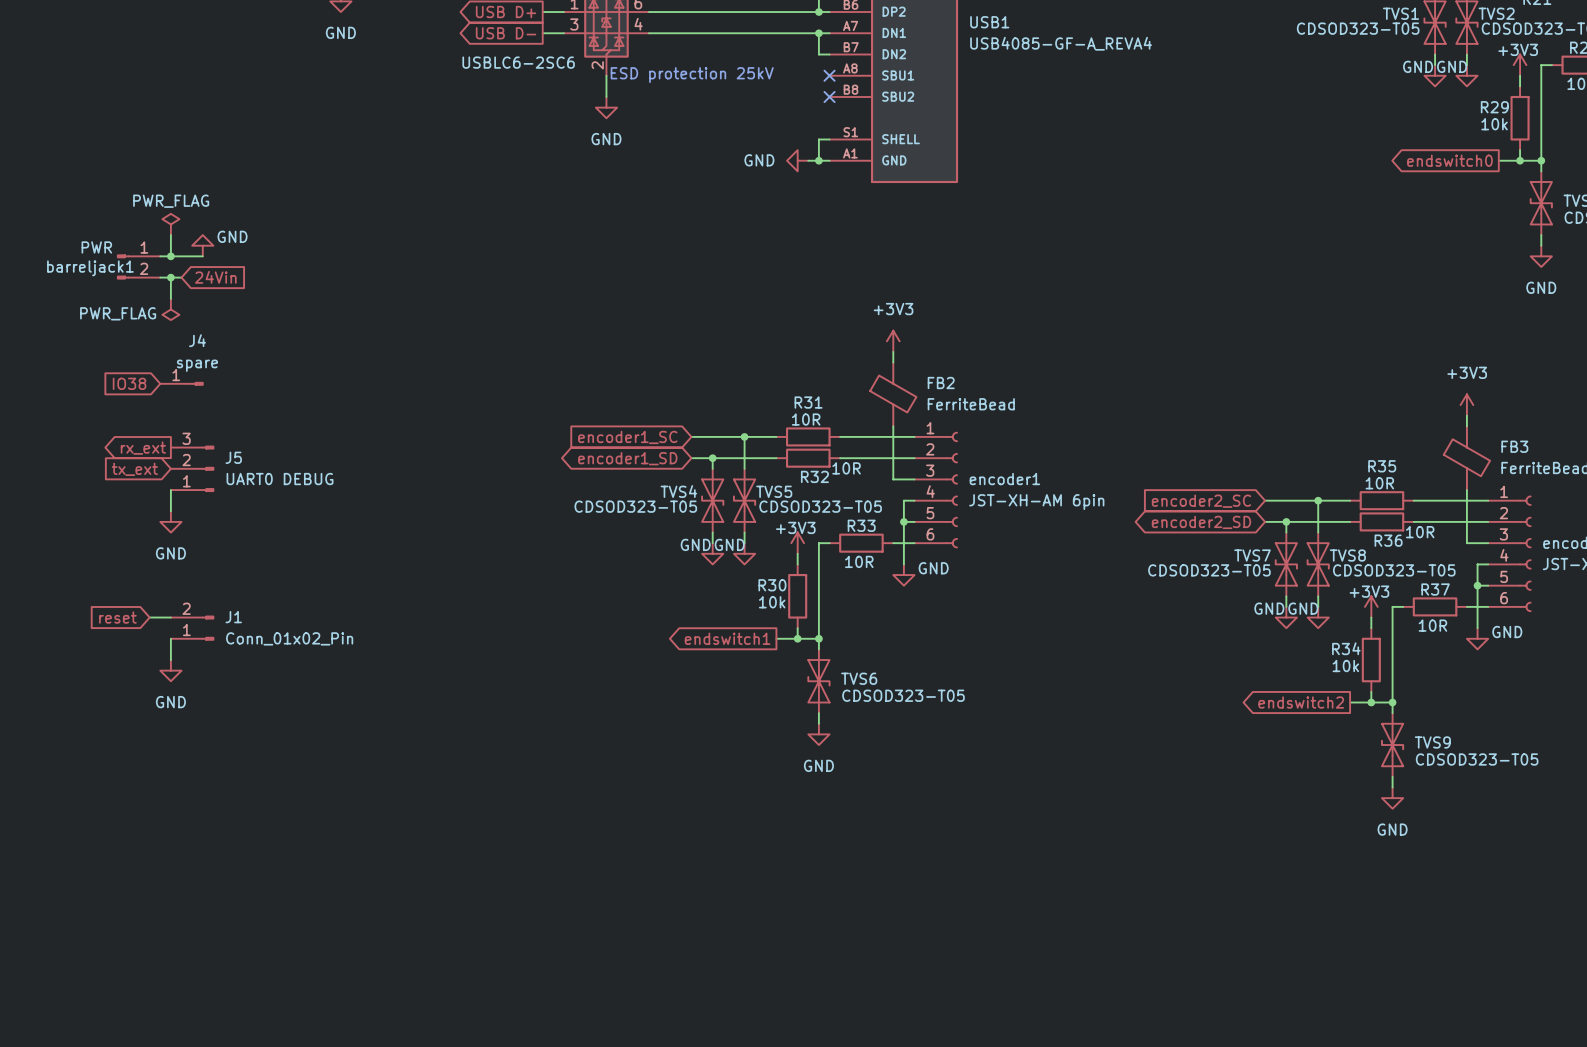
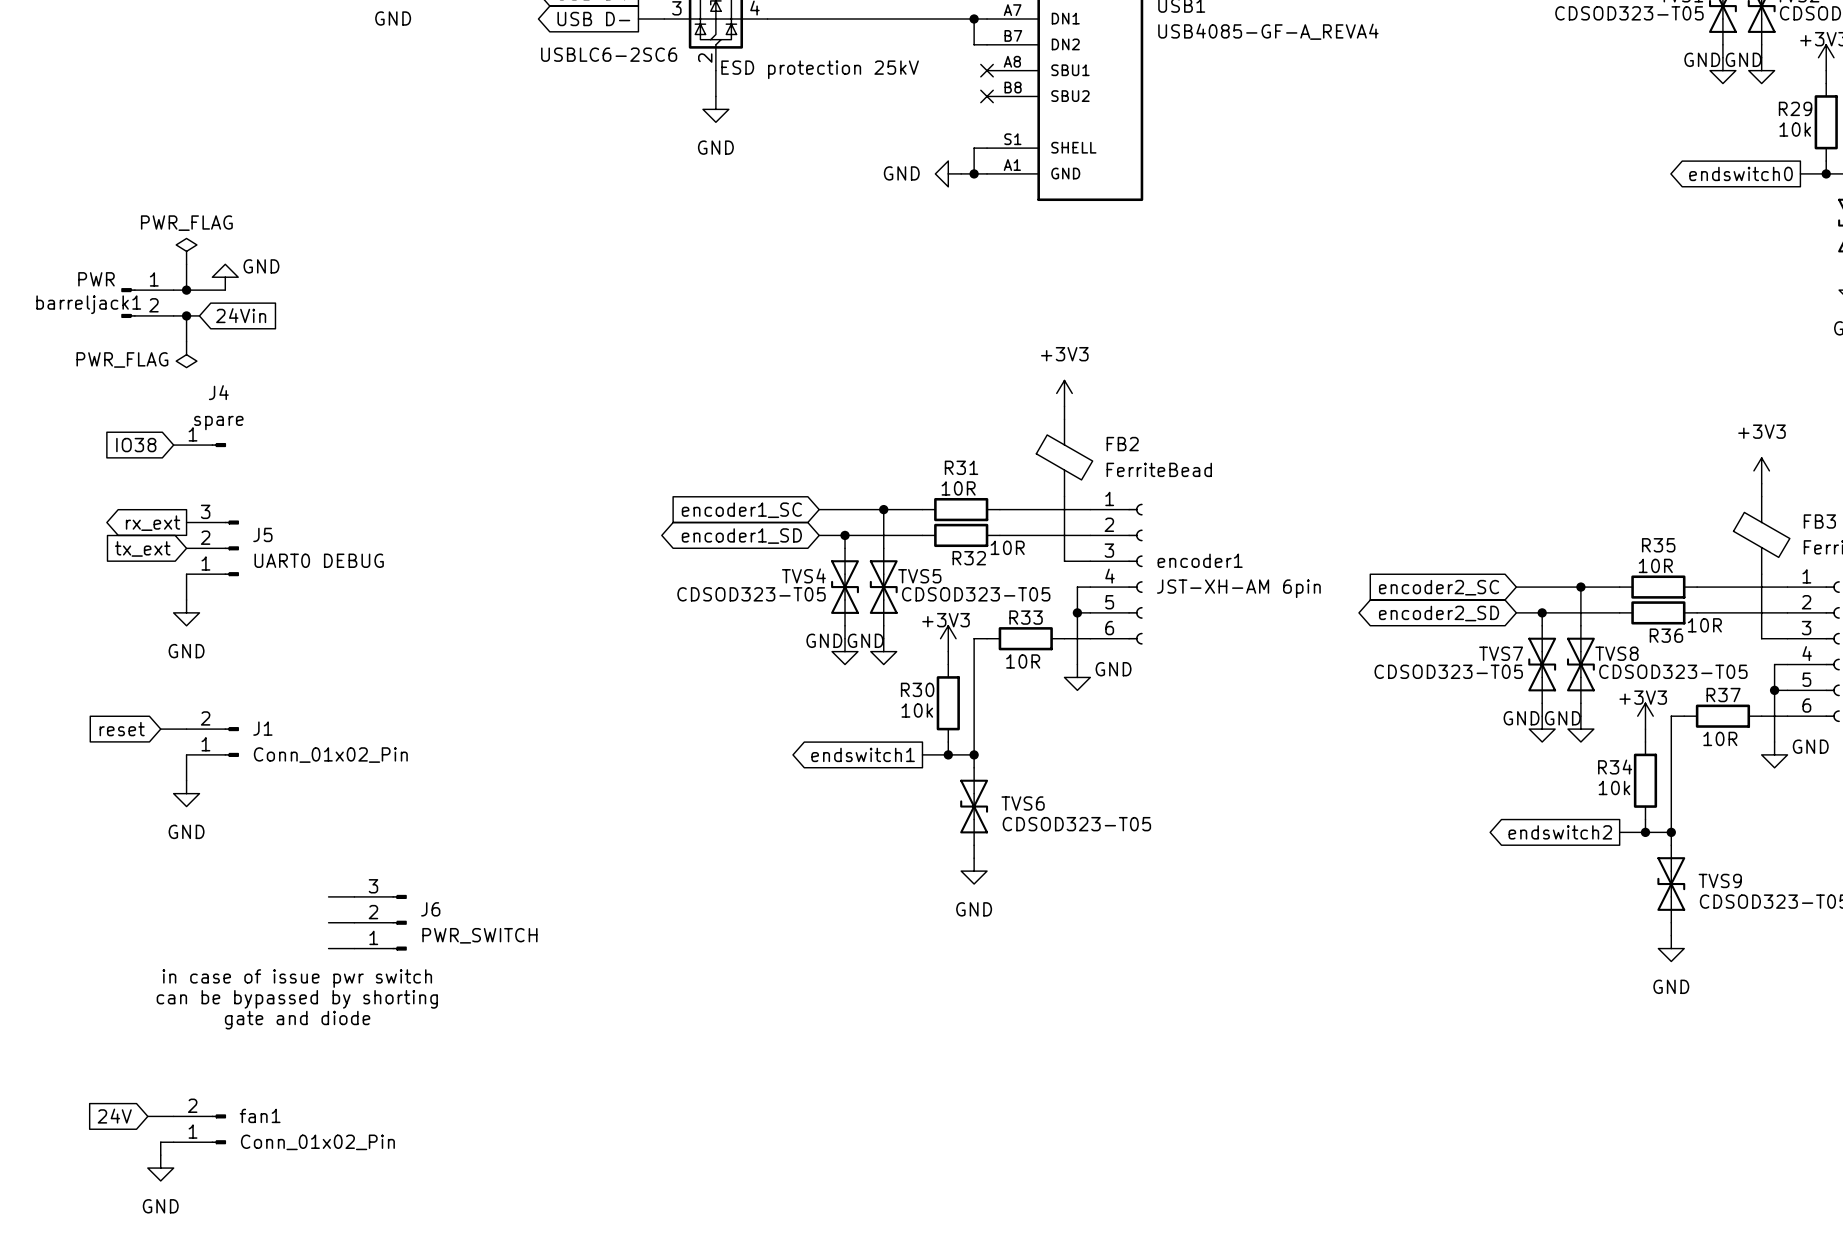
wire: none -> (328, 896) (354, 896)
wire: none -> (328, 922) (354, 922)
J6: none -> PWR_SWITCH (380, 922)
wire: none -> (328, 948) (354, 948)
text: none -> in case of issue pwr switch (297, 978)
text: none -> can be bypassed by shorting (297, 999)
text: none -> gate and diode (297, 1020)
global label: none -> 24V (114, 1116)
wire: none -> (147, 1116) (173, 1116)
fan1: none -> Conn_01x02_Pin (199, 1129)
wire: none -> (173, 1142) (160, 1142) (160, 1155)
power symbol: none -> GND (160, 1168)

